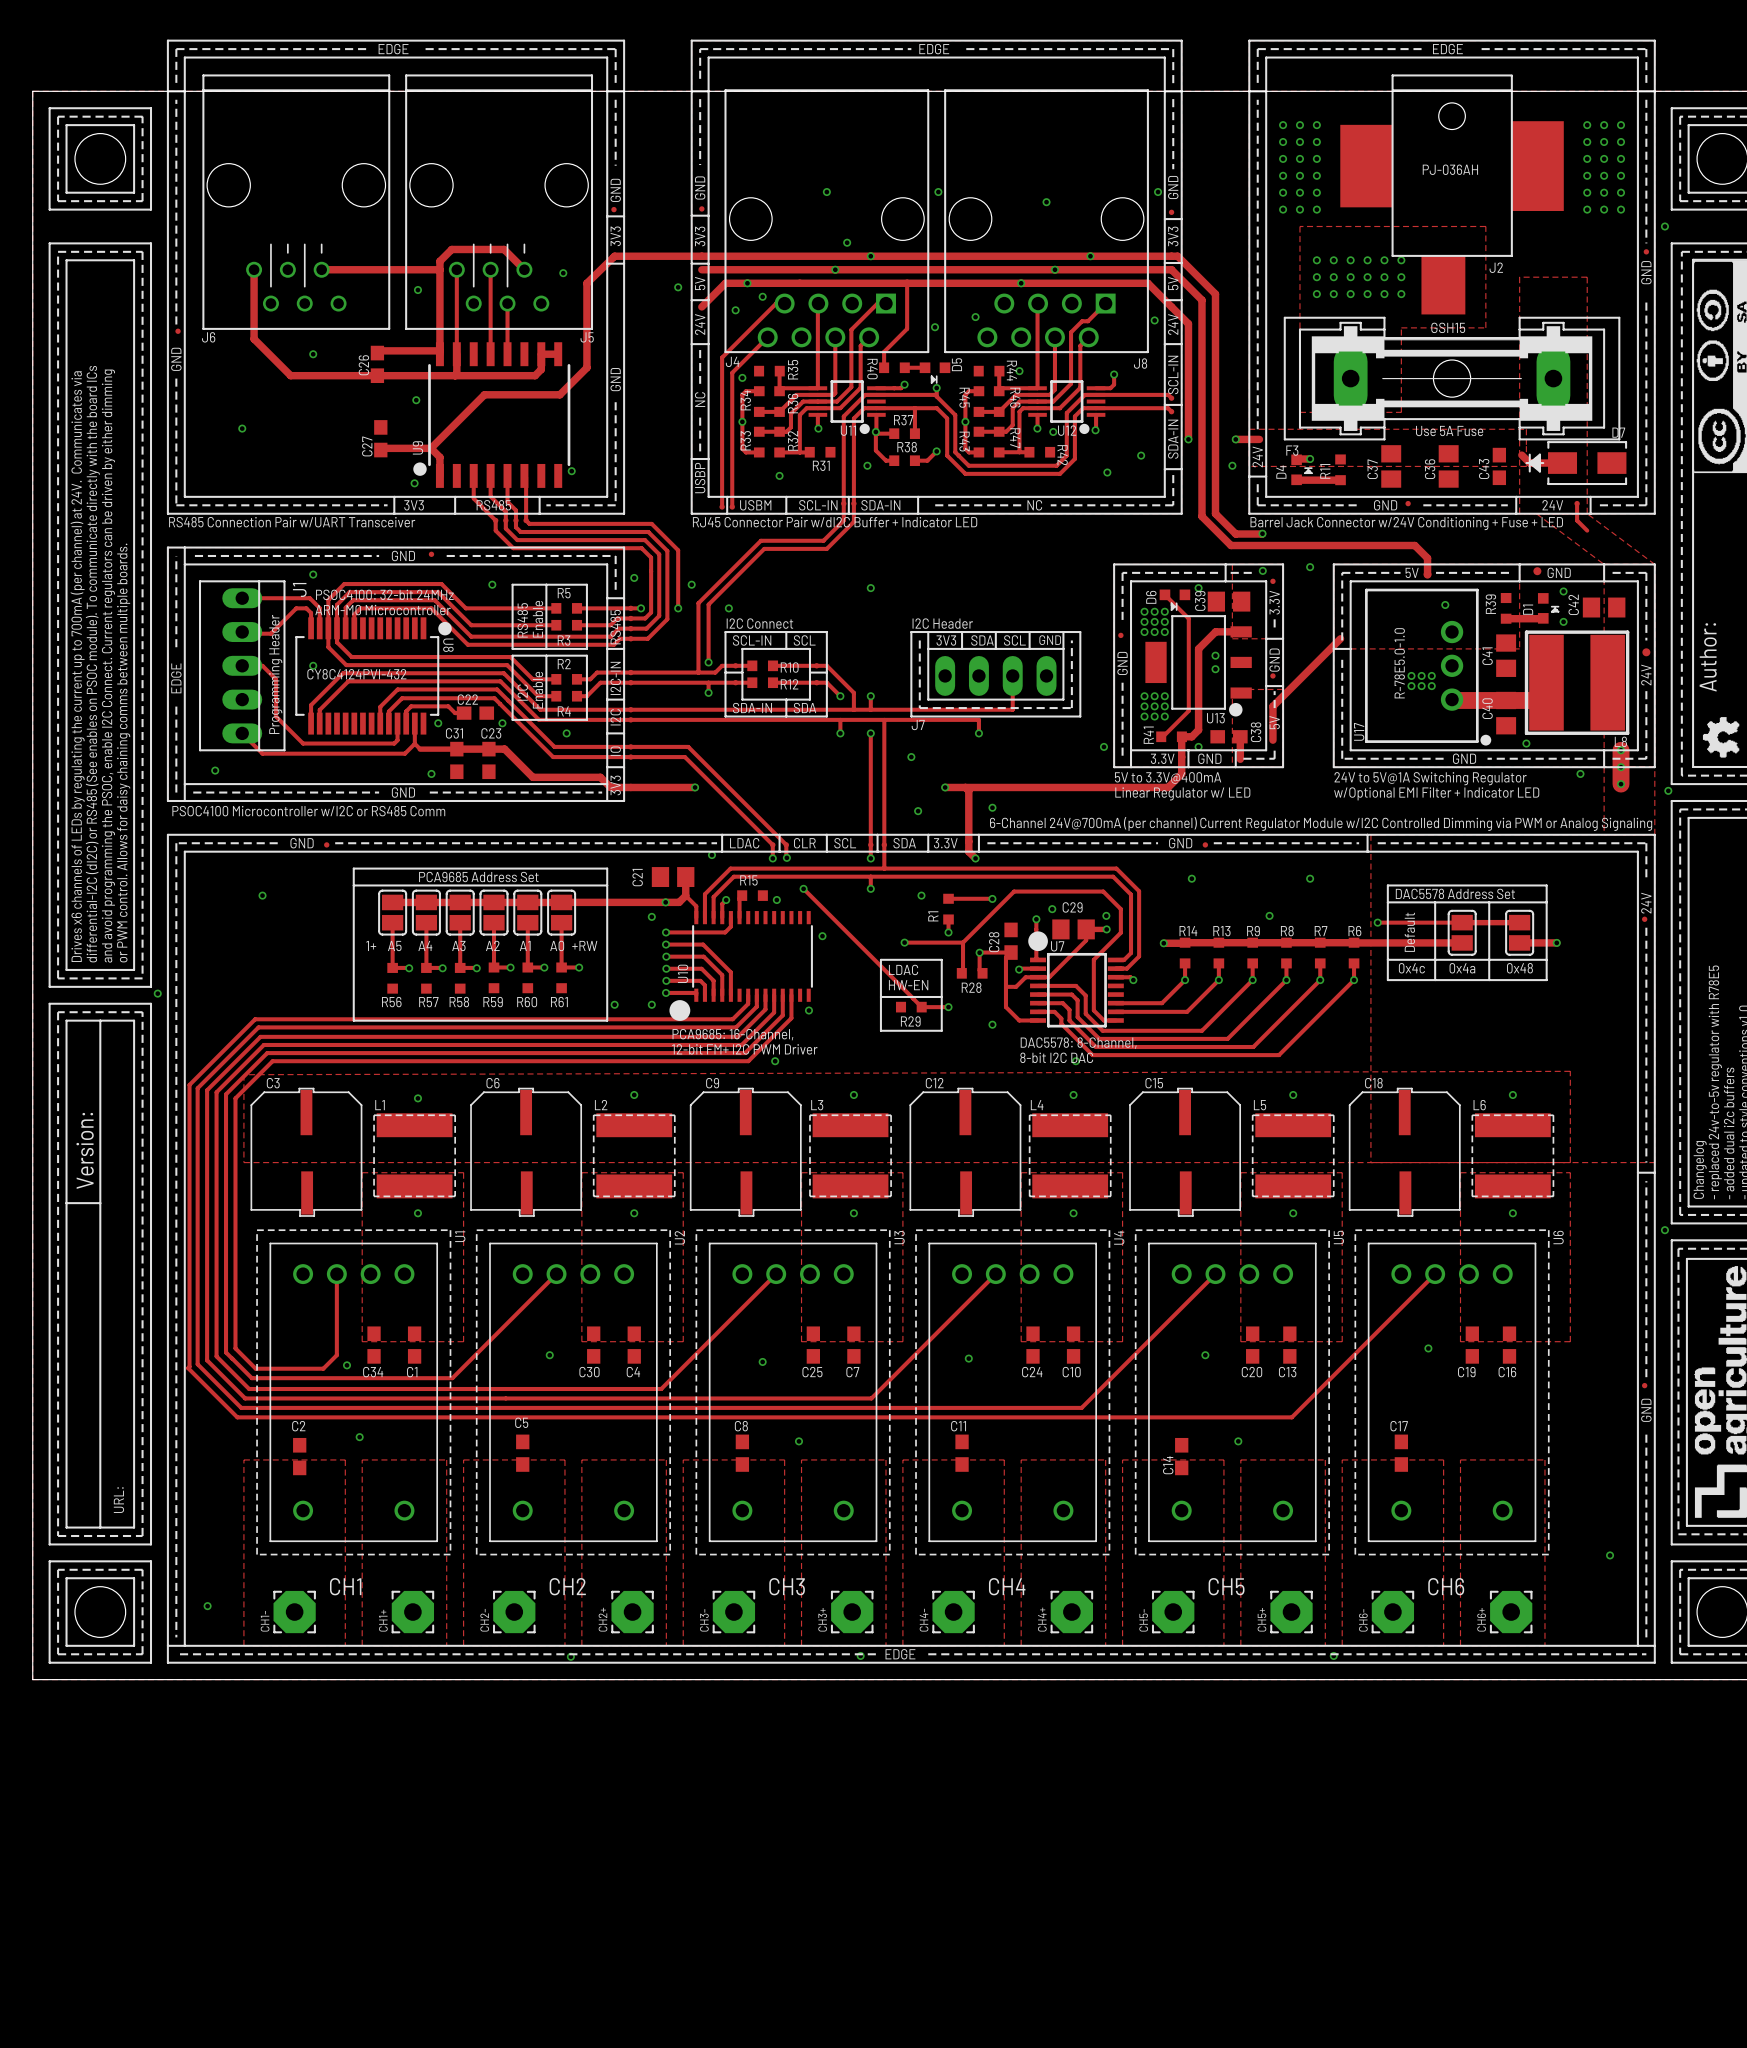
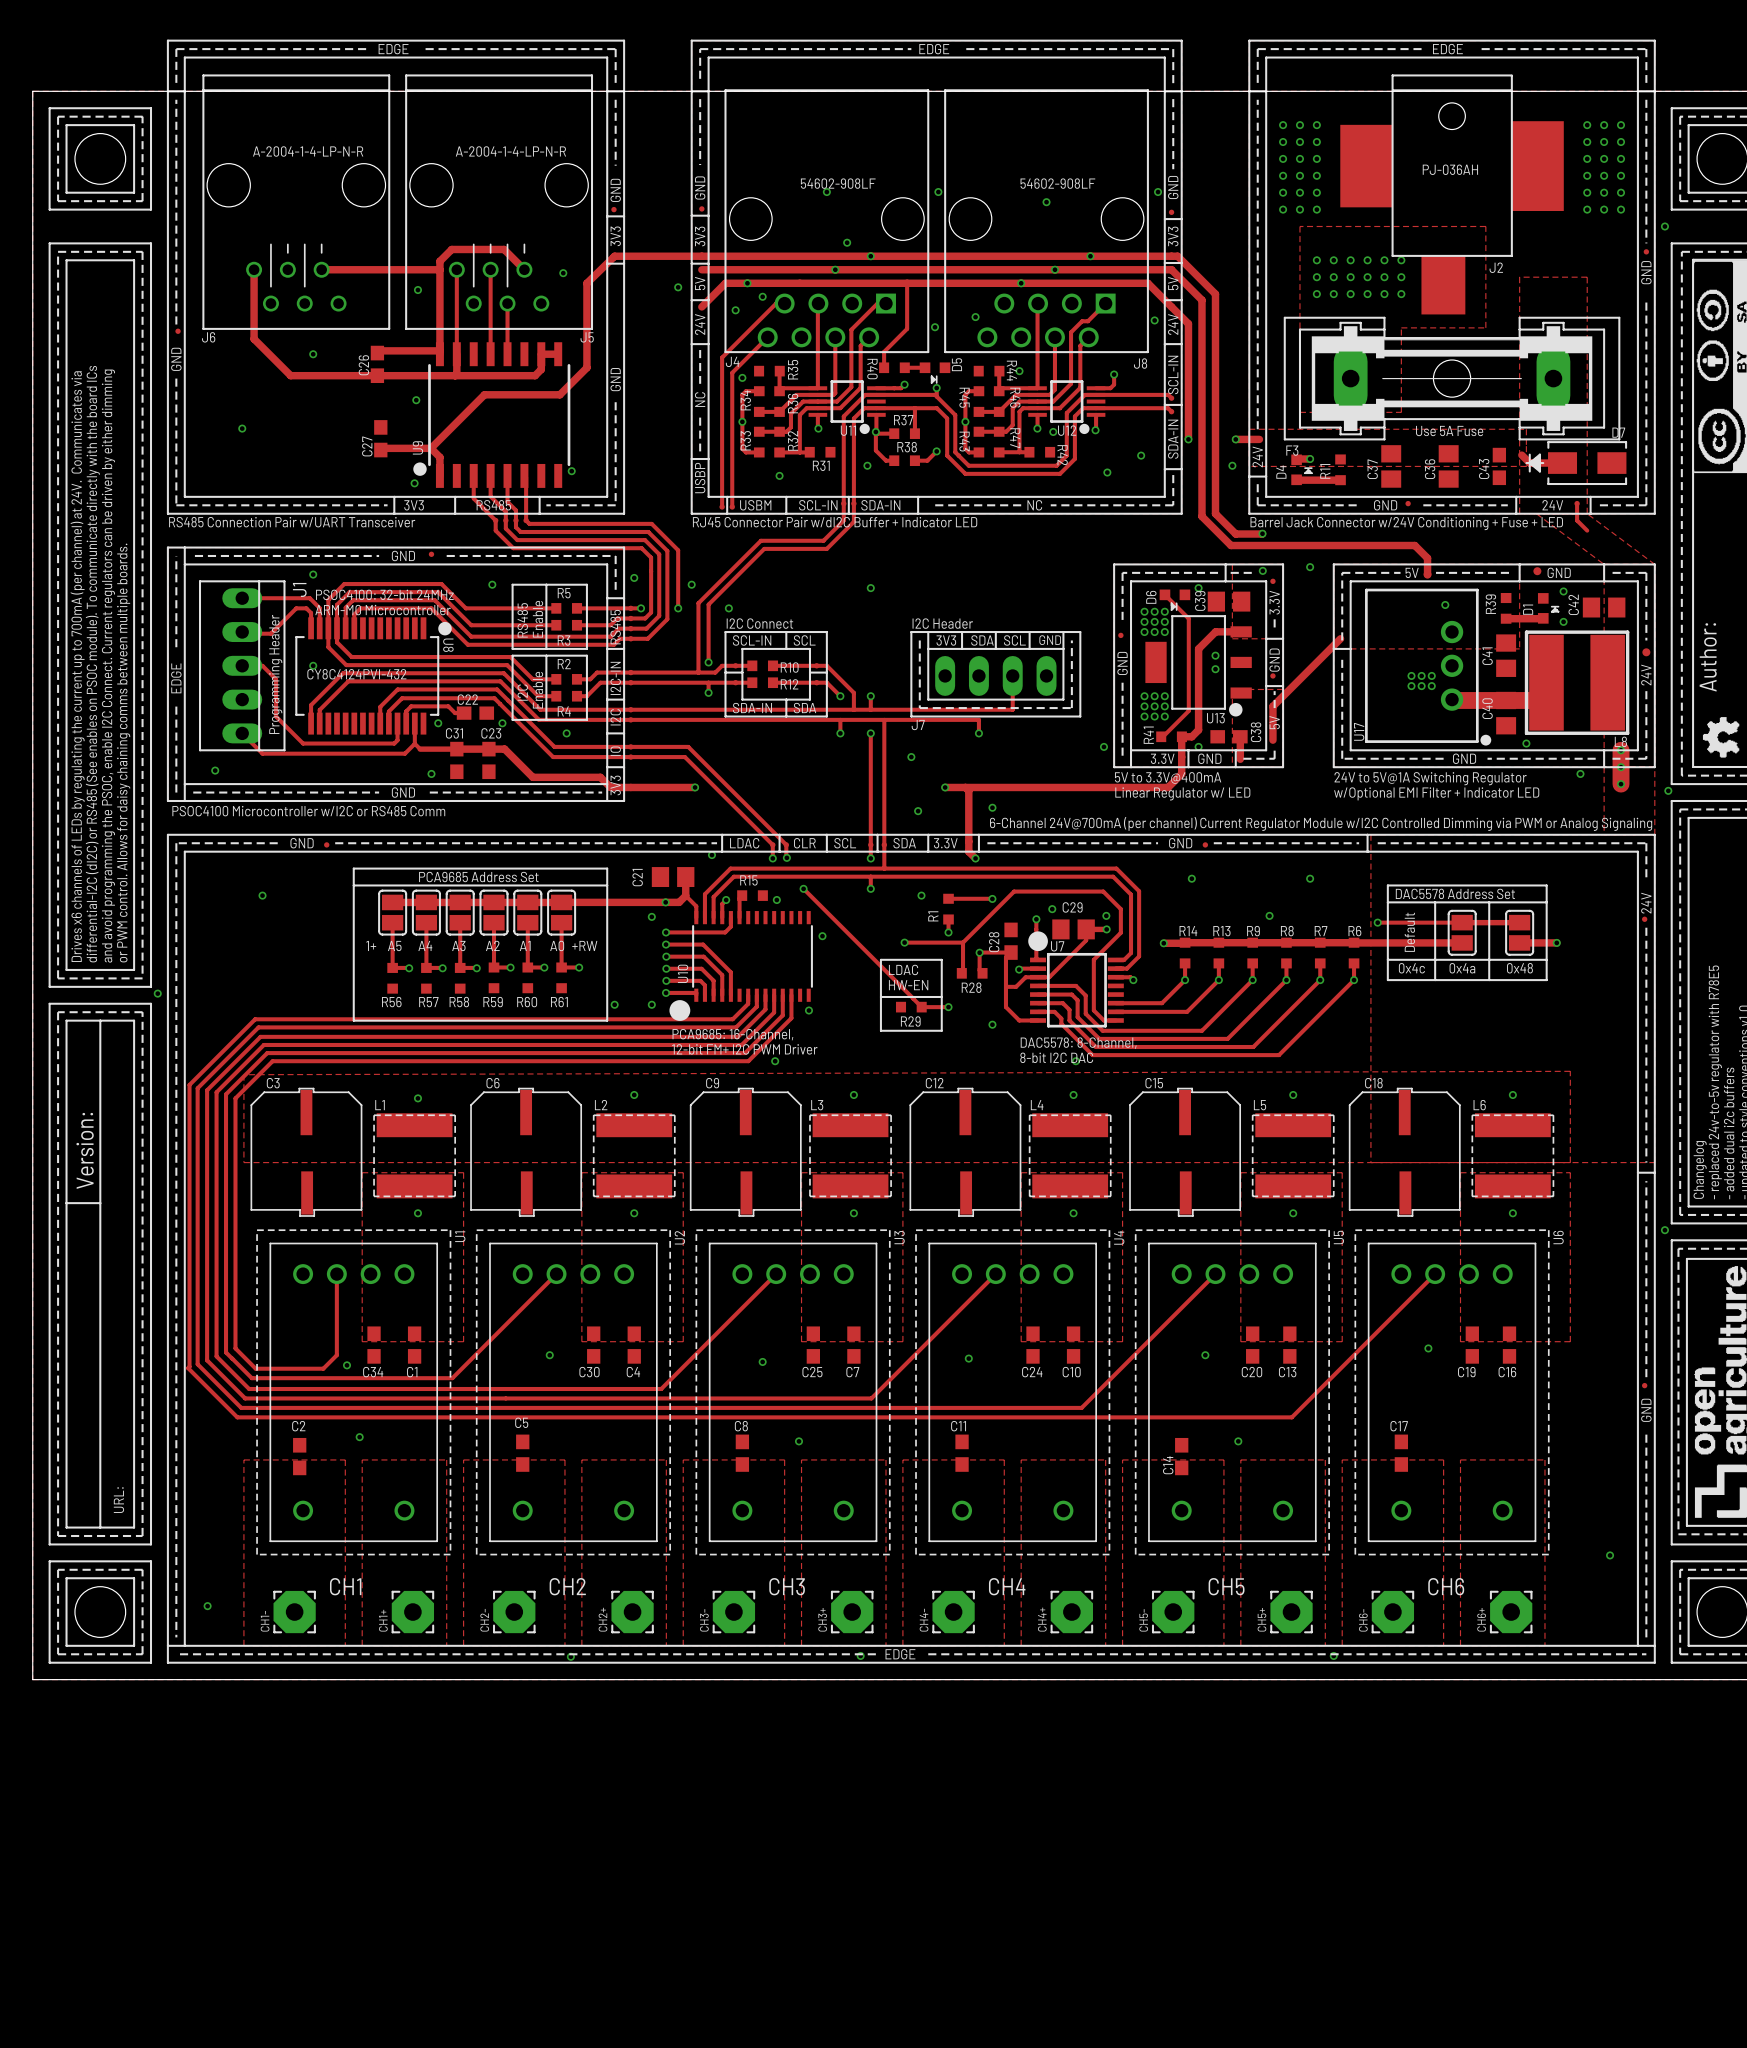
J6 value: none -> A-2004-1-4-LP-N-R (308, 151)
J5 value: none -> A-2004-1-4-LP-N-R (510, 151)
J4 value: none -> 54602-908LF (838, 183)
J8 value: none -> 54602-908LF (1057, 183)
F3 value: GSH15 (1448, 327) -> none
U17 value: R-78E5.0-1.0 (1399, 663) -> none

